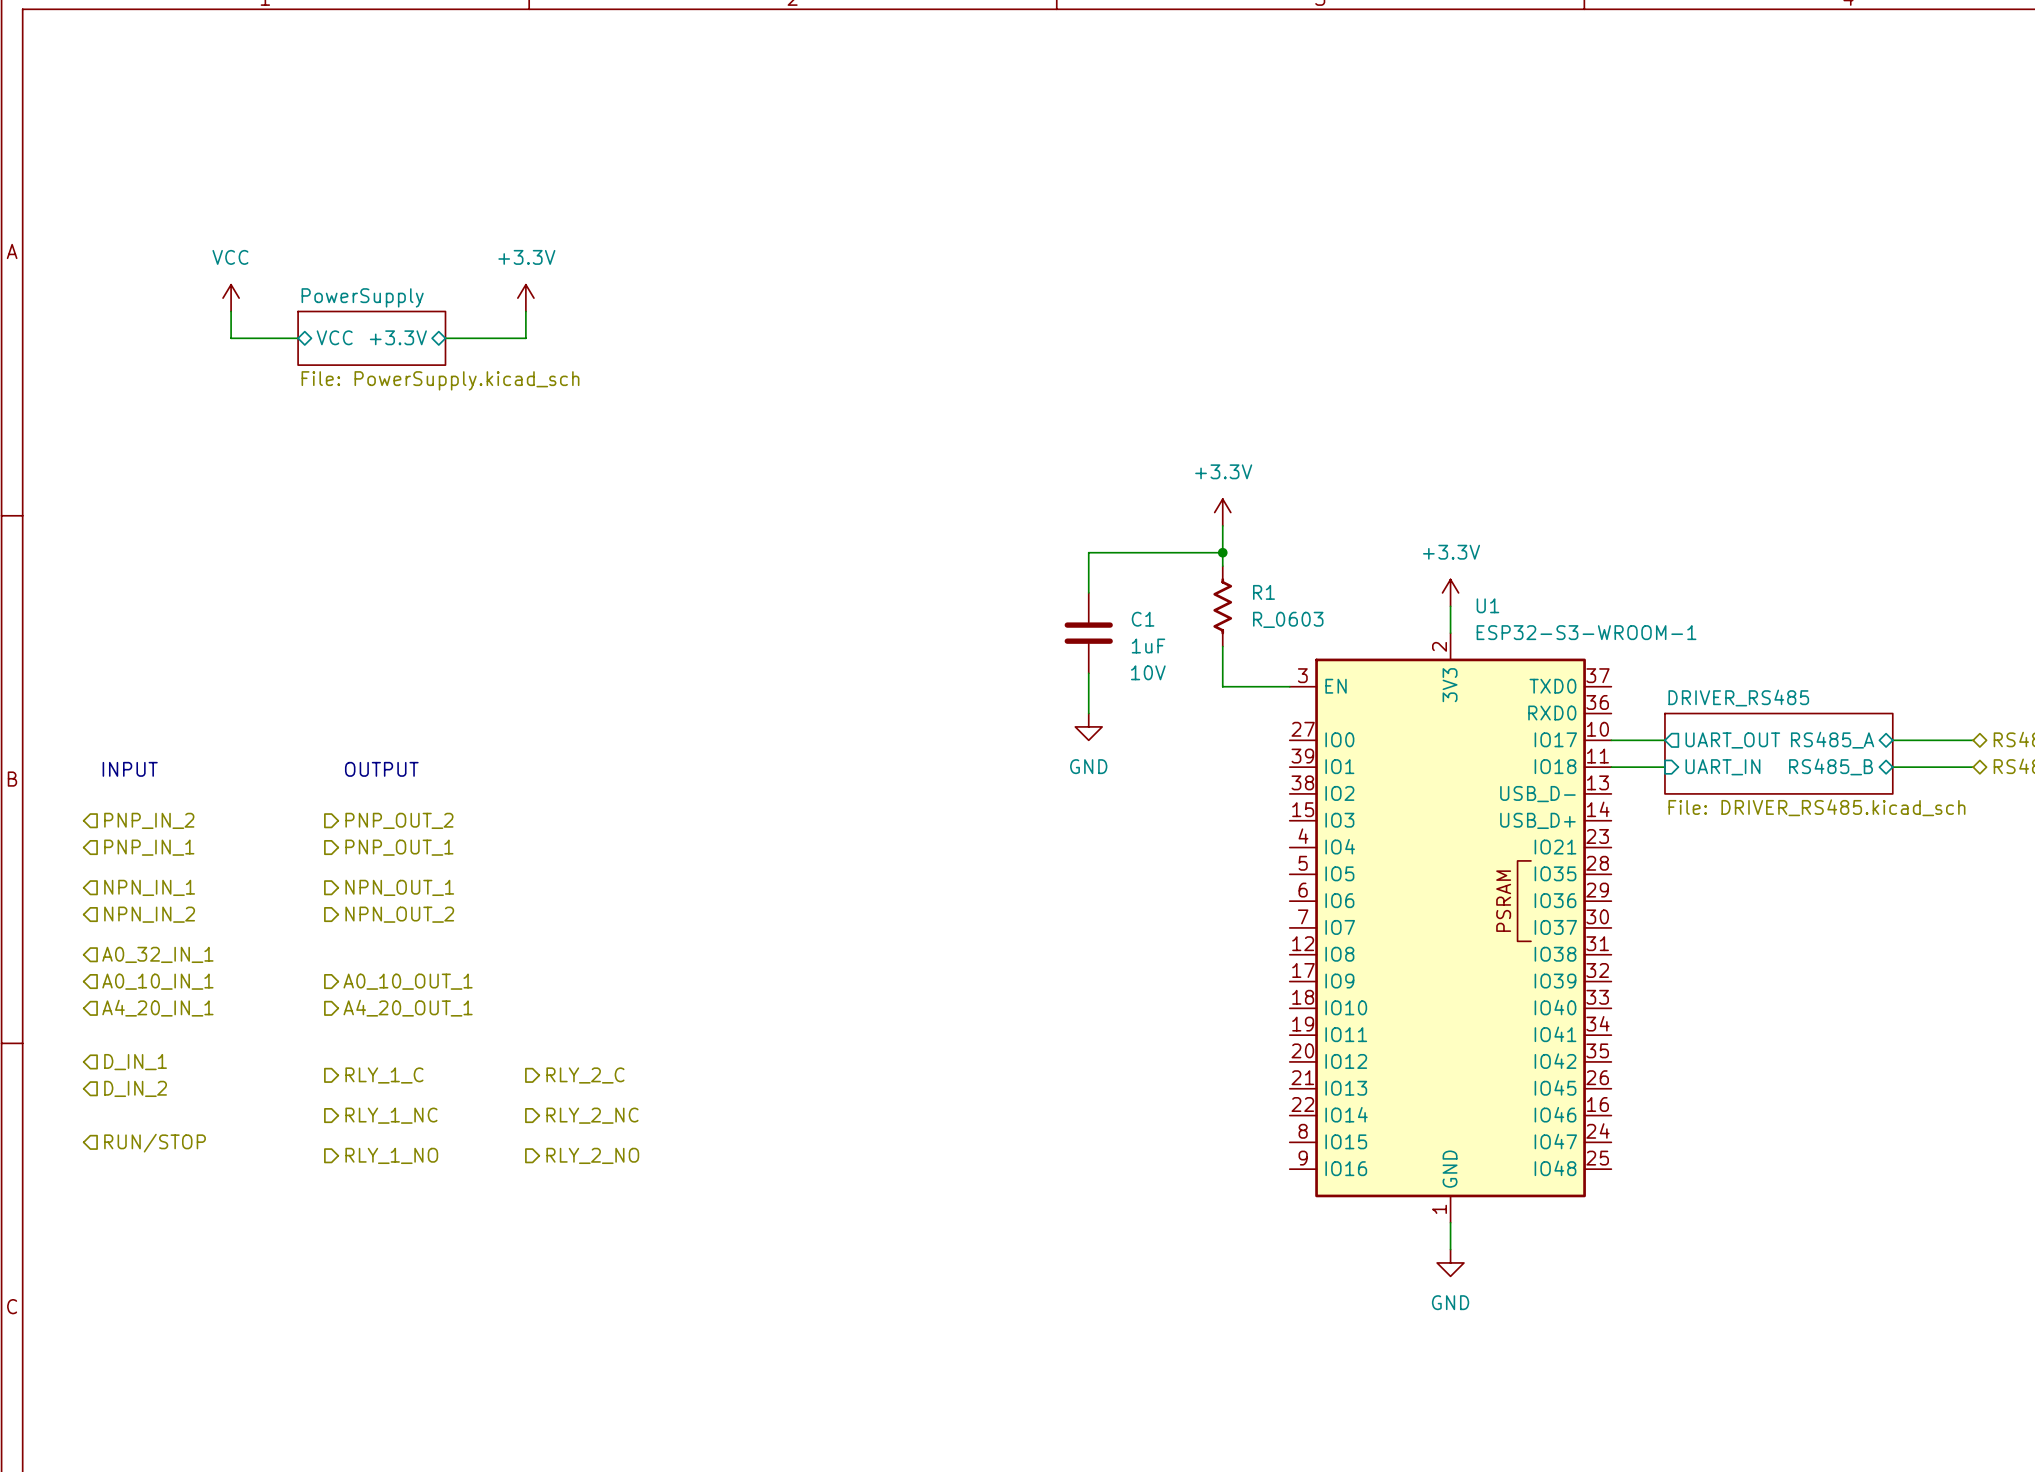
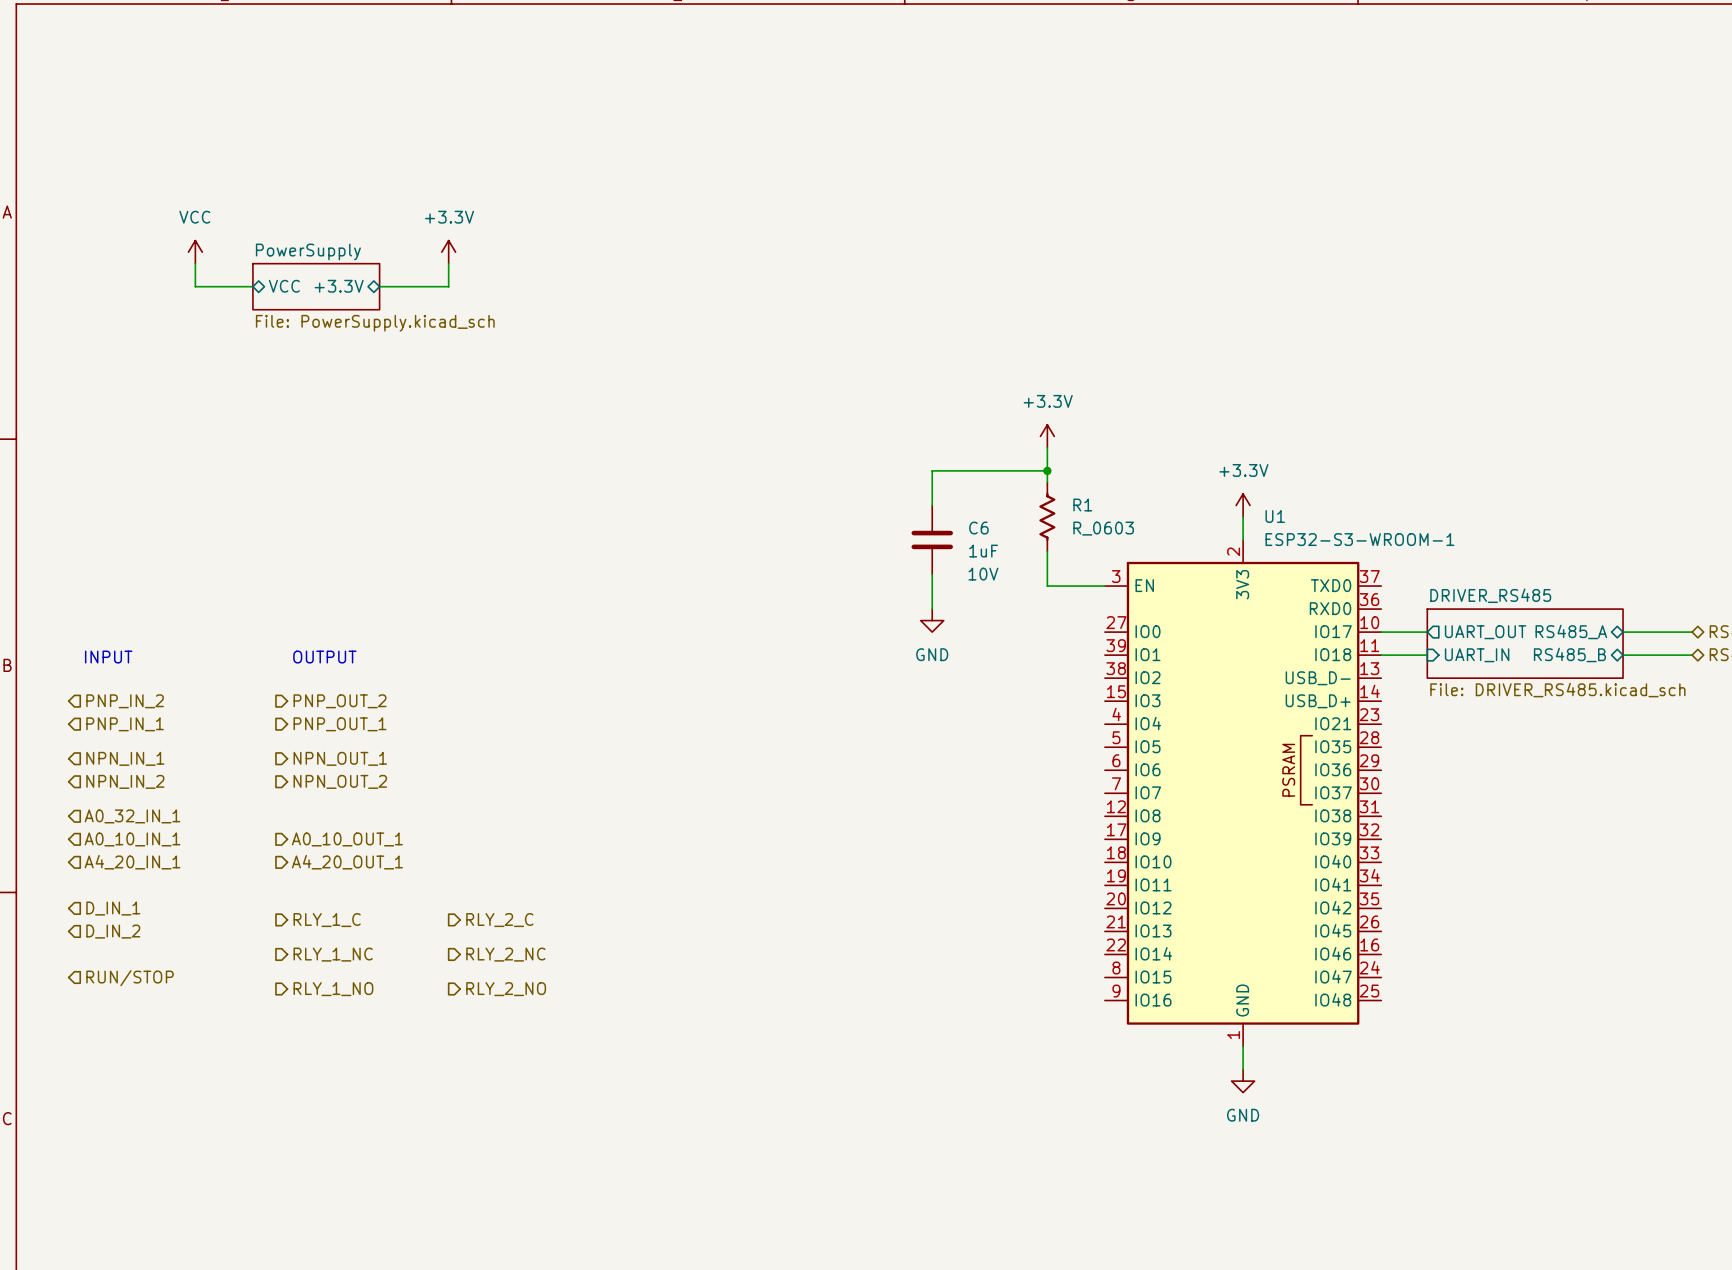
C1 name: C1 (1143, 619) -> C6 (978, 528)

